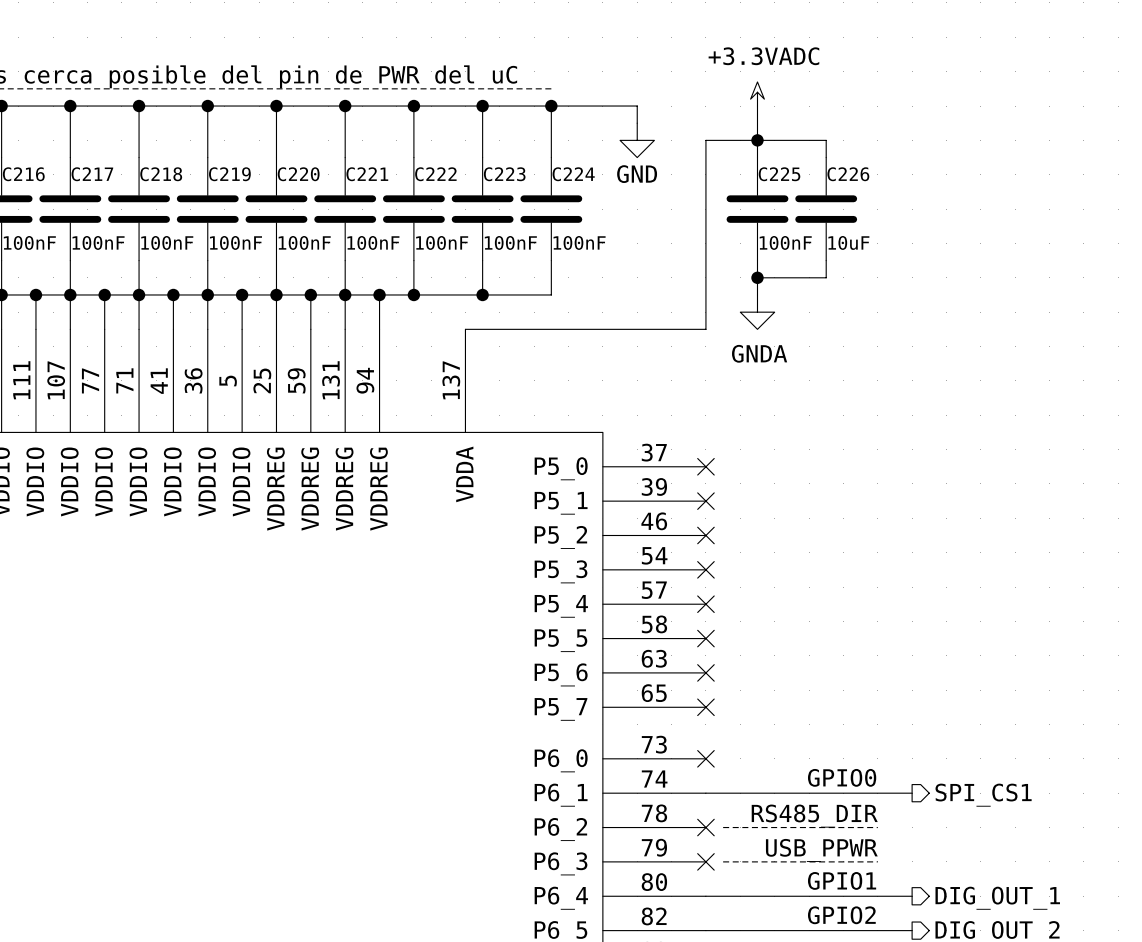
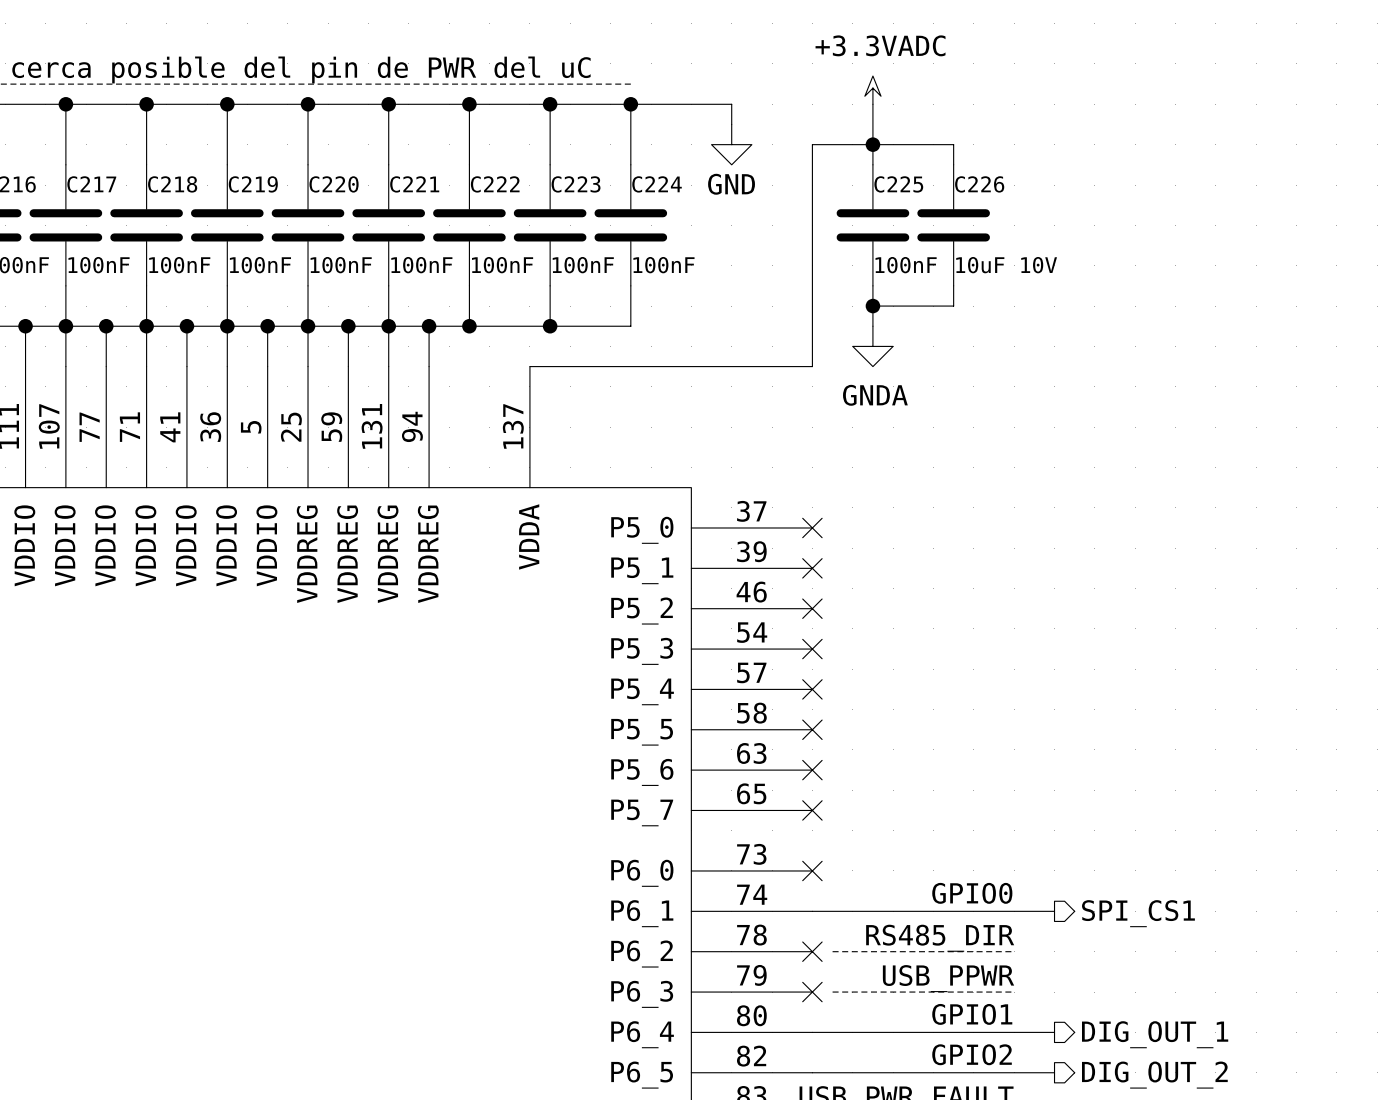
C226 value: 10uF (848, 242) -> 10uF 10V (1006, 265)

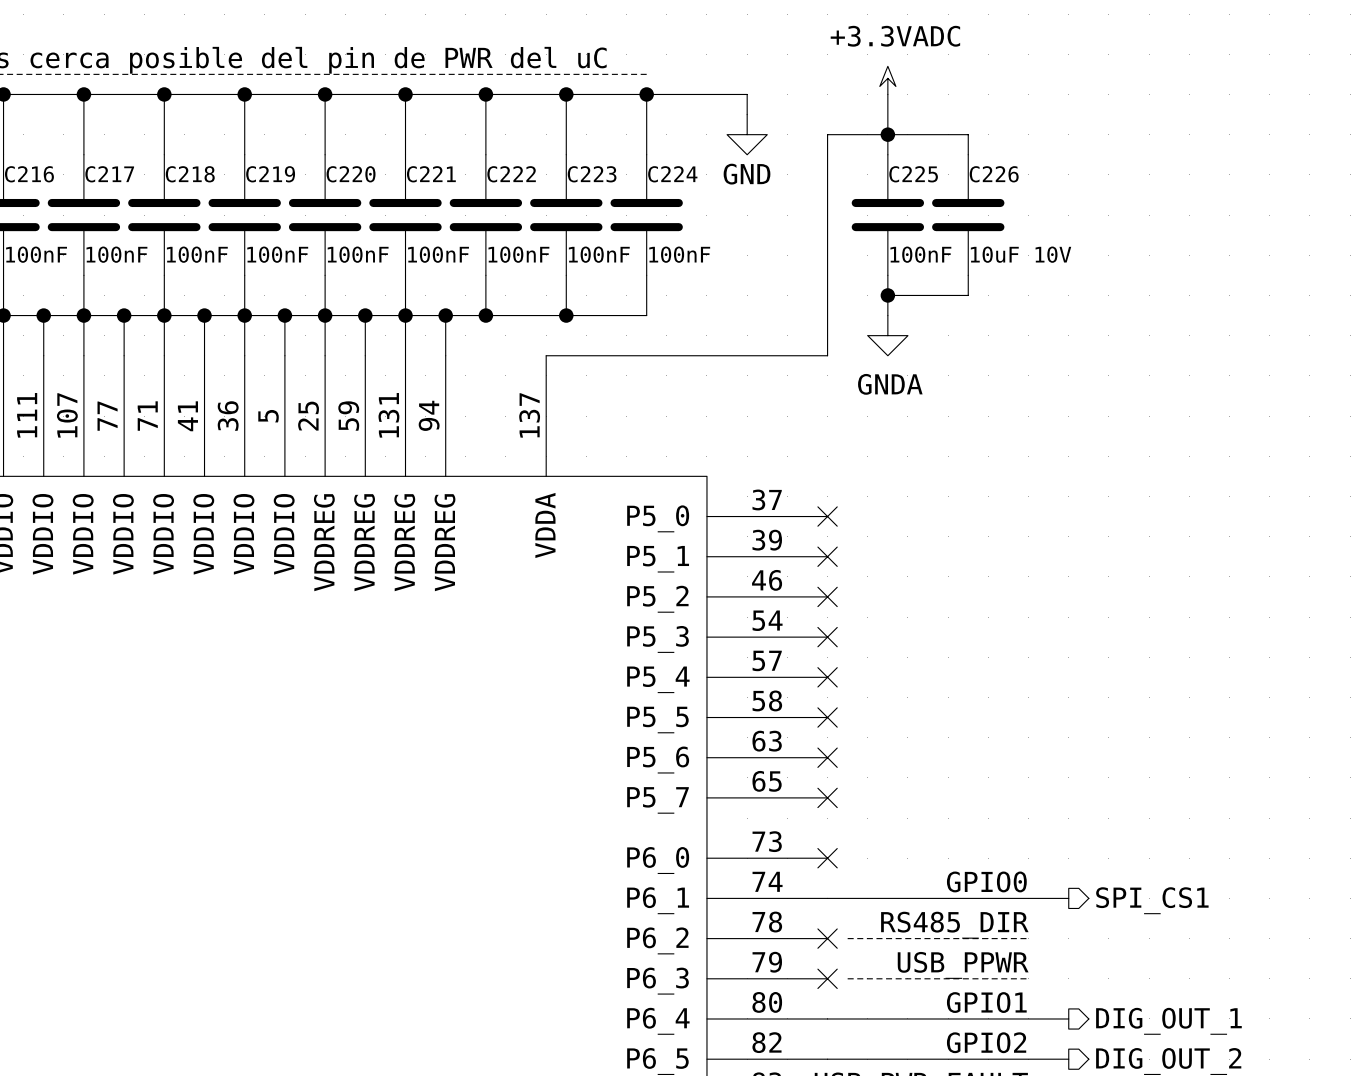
label: GPIO0 (972, 893) -> none
text: none -> GPIO0 (986, 881)
label: GPIO1 (972, 1014) -> none
text: none -> GPIO1 (986, 1002)
label: GPIO2 (972, 1054) -> none
text: none -> GPIO2 (986, 1042)

